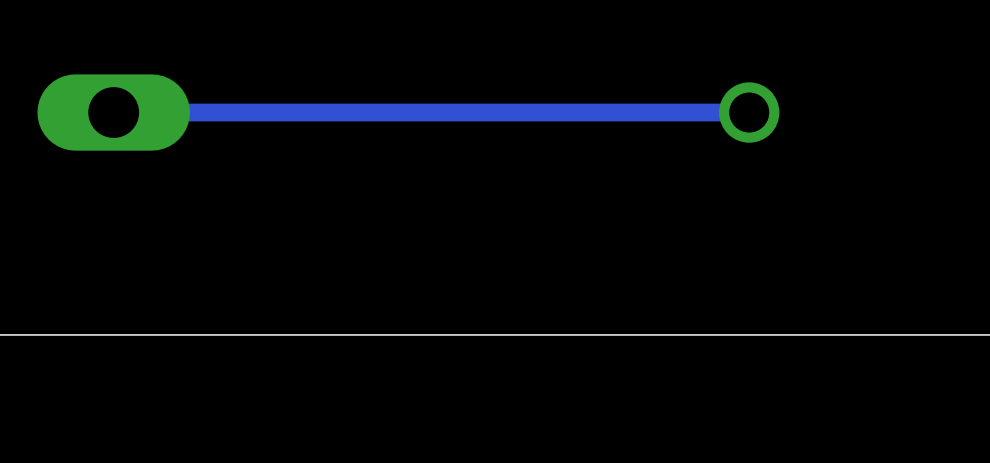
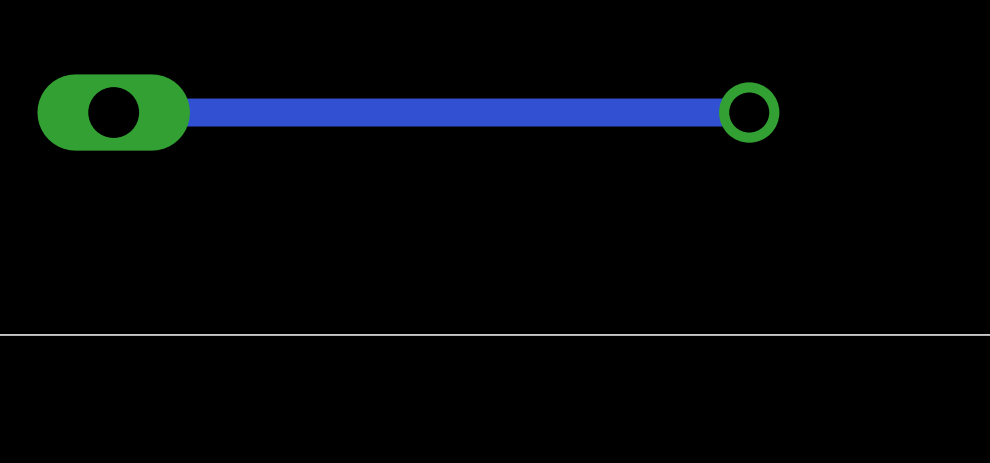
track width: thin (749, 112) (113, 112) -> thick (749, 112) (113, 112)

